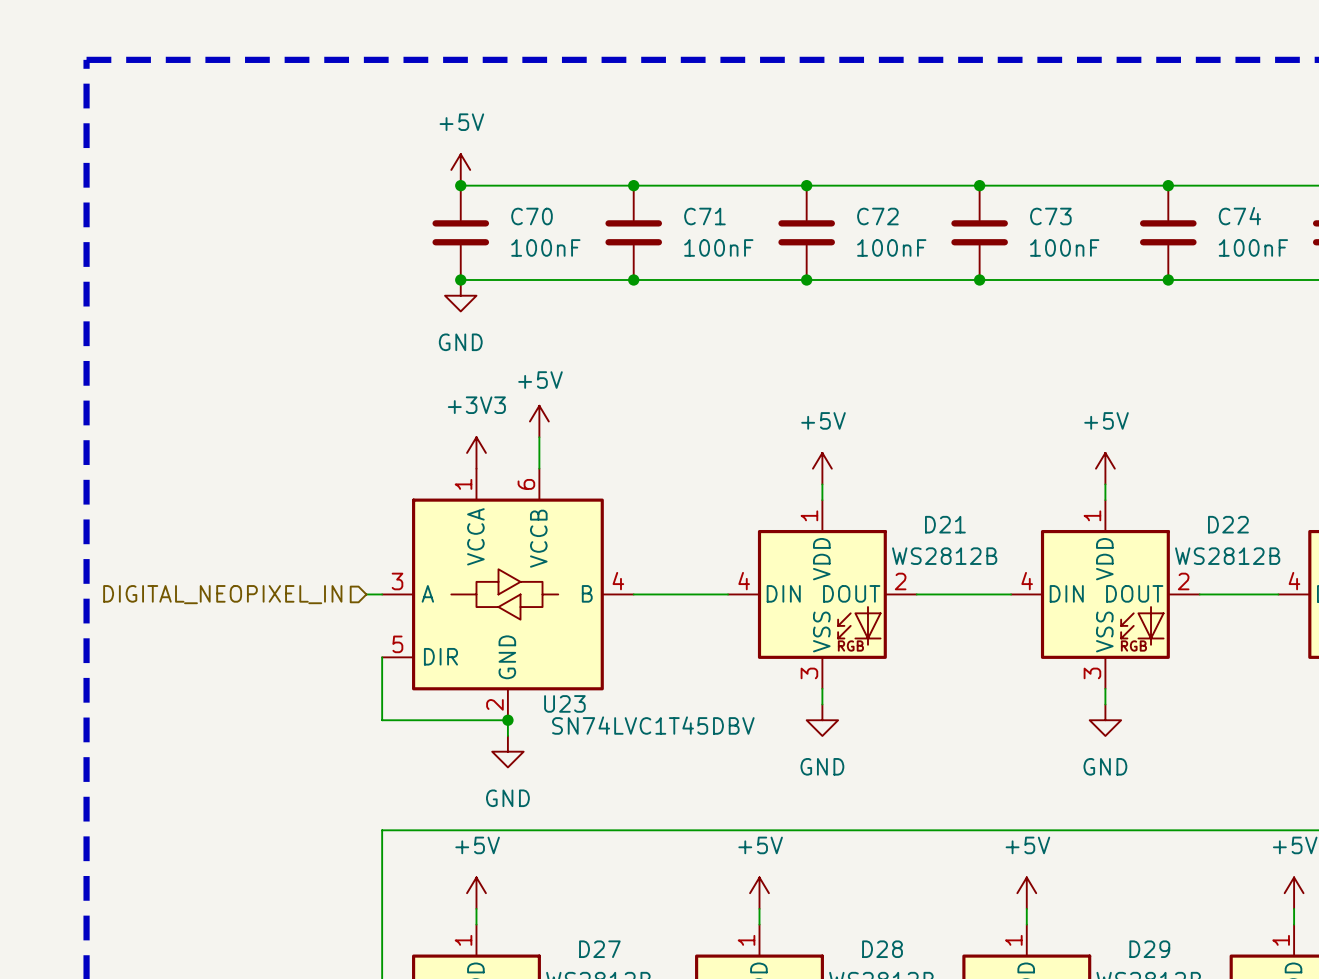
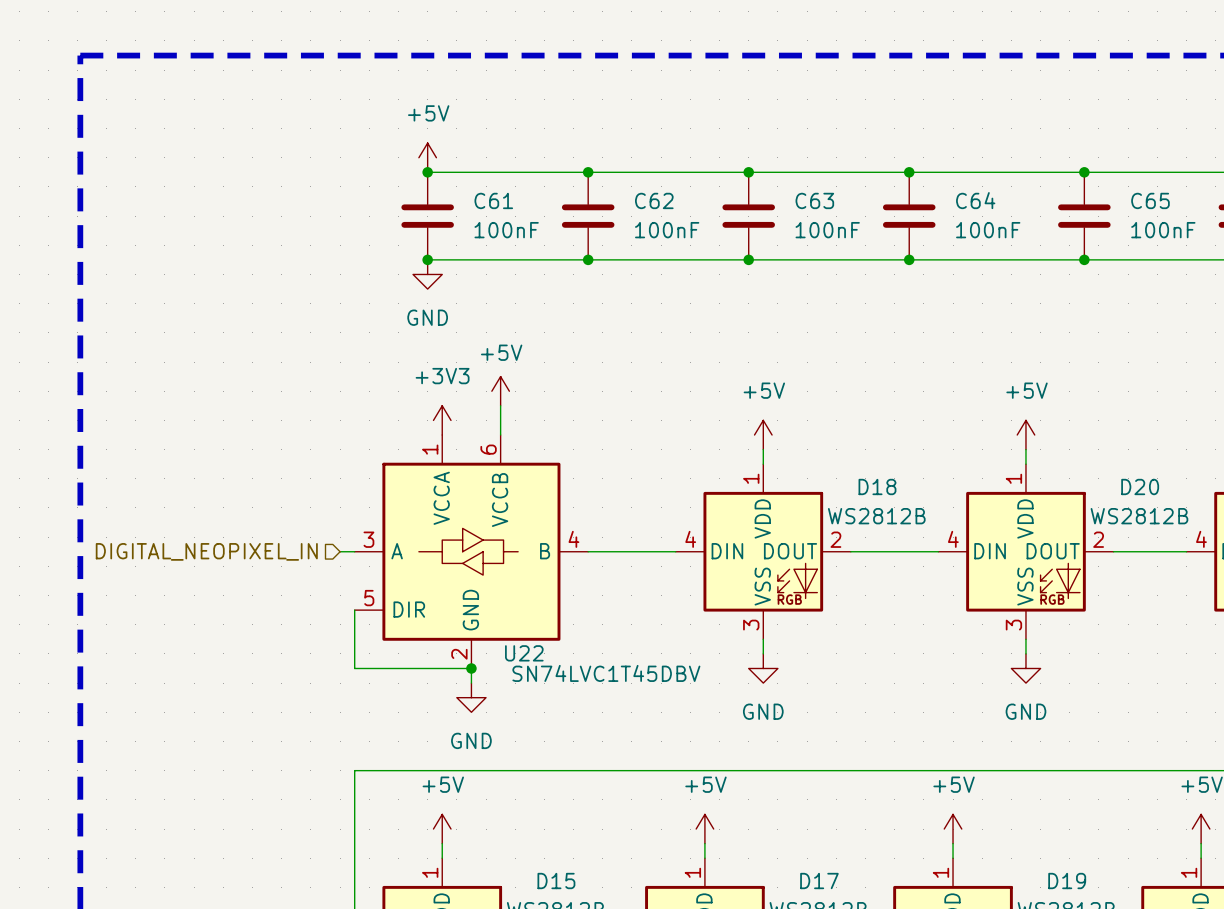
C70 name: C70 (532, 216) -> C61 (493, 200)
C71 name: C71 (704, 216) -> C62 (654, 200)
C72 name: C72 (877, 216) -> C63 (814, 200)
C73 name: C73 (1050, 216) -> C64 (975, 200)
C74 name: C74 (1239, 216) -> C65 (1150, 200)
D21 name: D21 (945, 524) -> D18 (877, 486)
D22 name: D22 (1228, 524) -> D20 (1140, 486)
U23 name: U23 (564, 703) -> U22 (524, 653)
D27 name: D27 (599, 949) -> D15 (556, 881)
D28 name: D28 (882, 949) -> D17 (819, 881)
D29 name: D29 (1149, 949) -> D19 (1067, 881)

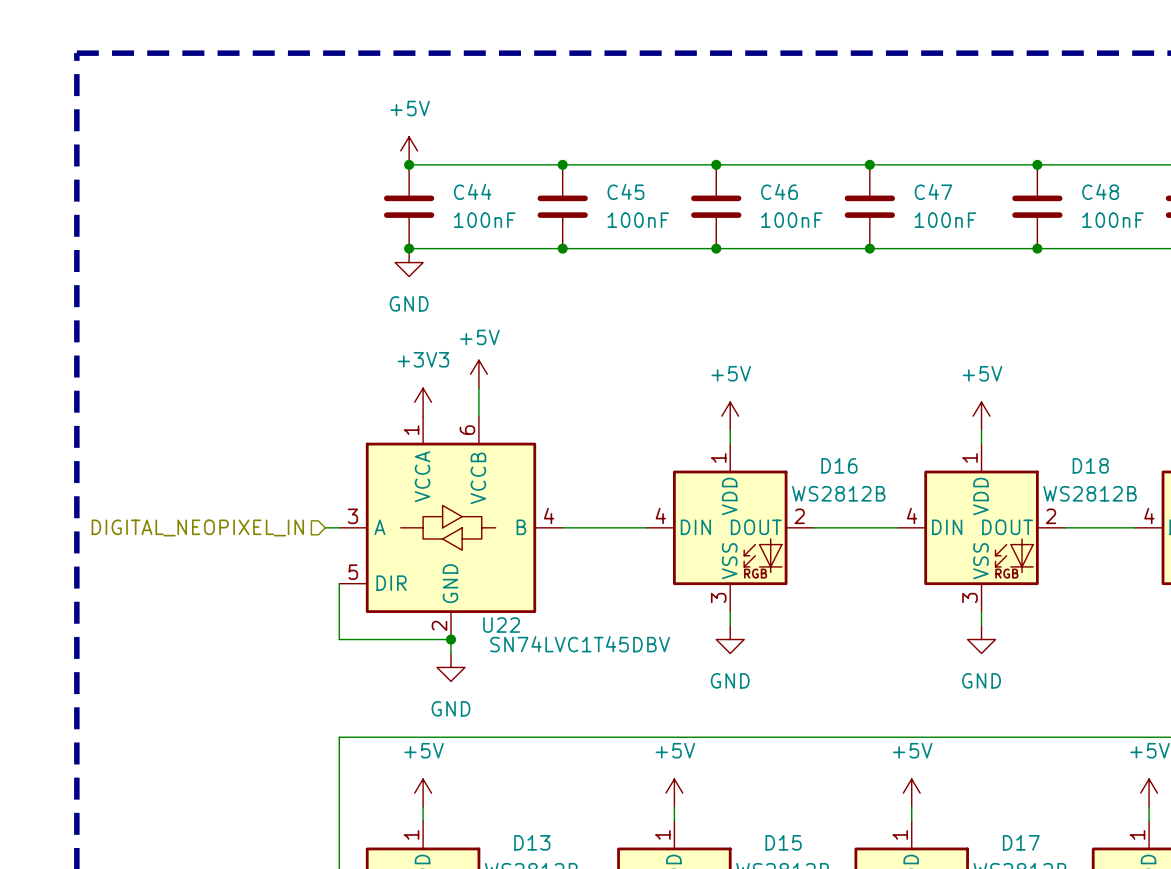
C61 name: C61 (493, 200) -> C44 (472, 191)
C62 name: C62 (654, 200) -> C45 (625, 191)
C63 name: C63 (814, 200) -> C46 (779, 191)
C64 name: C64 (975, 200) -> C47 (933, 191)
C65 name: C65 (1150, 200) -> C48 (1100, 191)
D18 name: D18 (877, 486) -> D16 (839, 465)
D20 name: D20 (1140, 486) -> D18 (1090, 465)
D15 name: D15 (556, 881) -> D13 (532, 842)
D17 name: D17 (819, 881) -> D15 (783, 842)
D19 name: D19 (1067, 881) -> D17 (1021, 842)

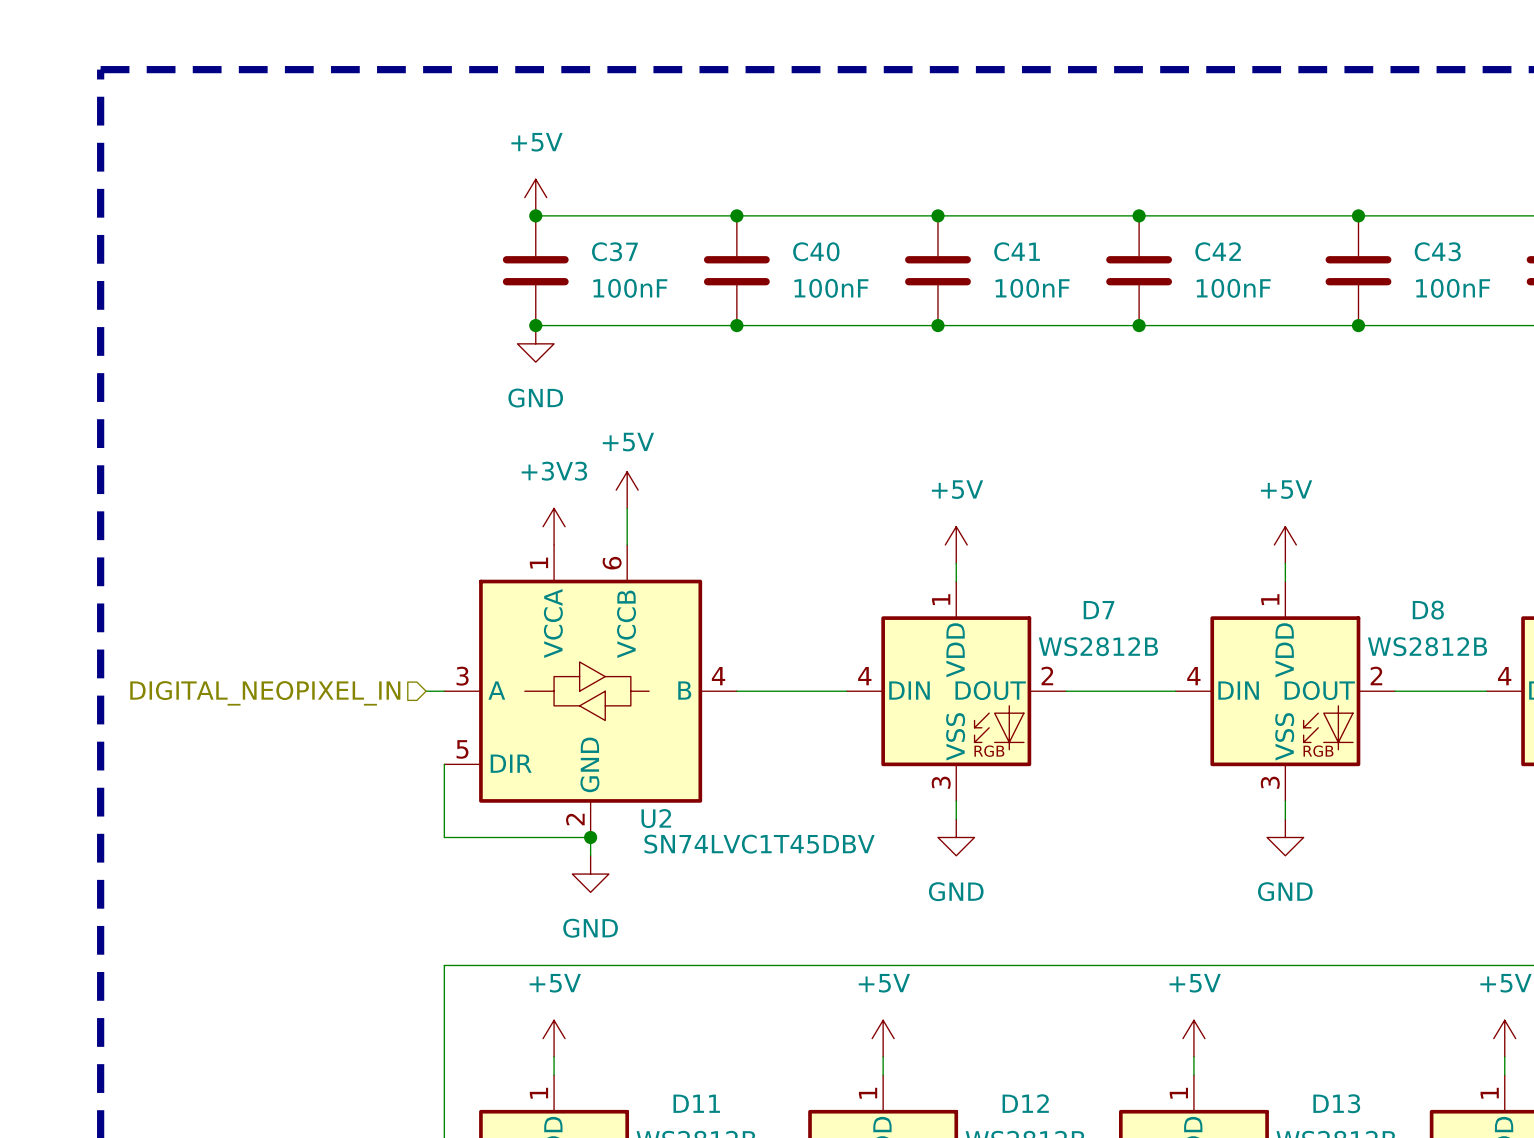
C44 name: C44 (472, 191) -> C37 (614, 251)
C45 name: C45 (625, 191) -> C40 (816, 251)
C46 name: C46 (779, 191) -> C41 (1017, 251)
C47 name: C47 (933, 191) -> C42 (1218, 251)
C48 name: C48 (1100, 191) -> C43 (1437, 251)
D16 name: D16 (839, 465) -> D7 (1099, 610)
D18 name: D18 (1090, 465) -> D8 (1428, 610)
U22 name: U22 (501, 625) -> U2 (656, 818)
D13 name: D13 (532, 842) -> D11 (696, 1103)
D15 name: D15 (783, 842) -> D12 (1025, 1103)
D17 name: D17 (1021, 842) -> D13 (1336, 1103)

